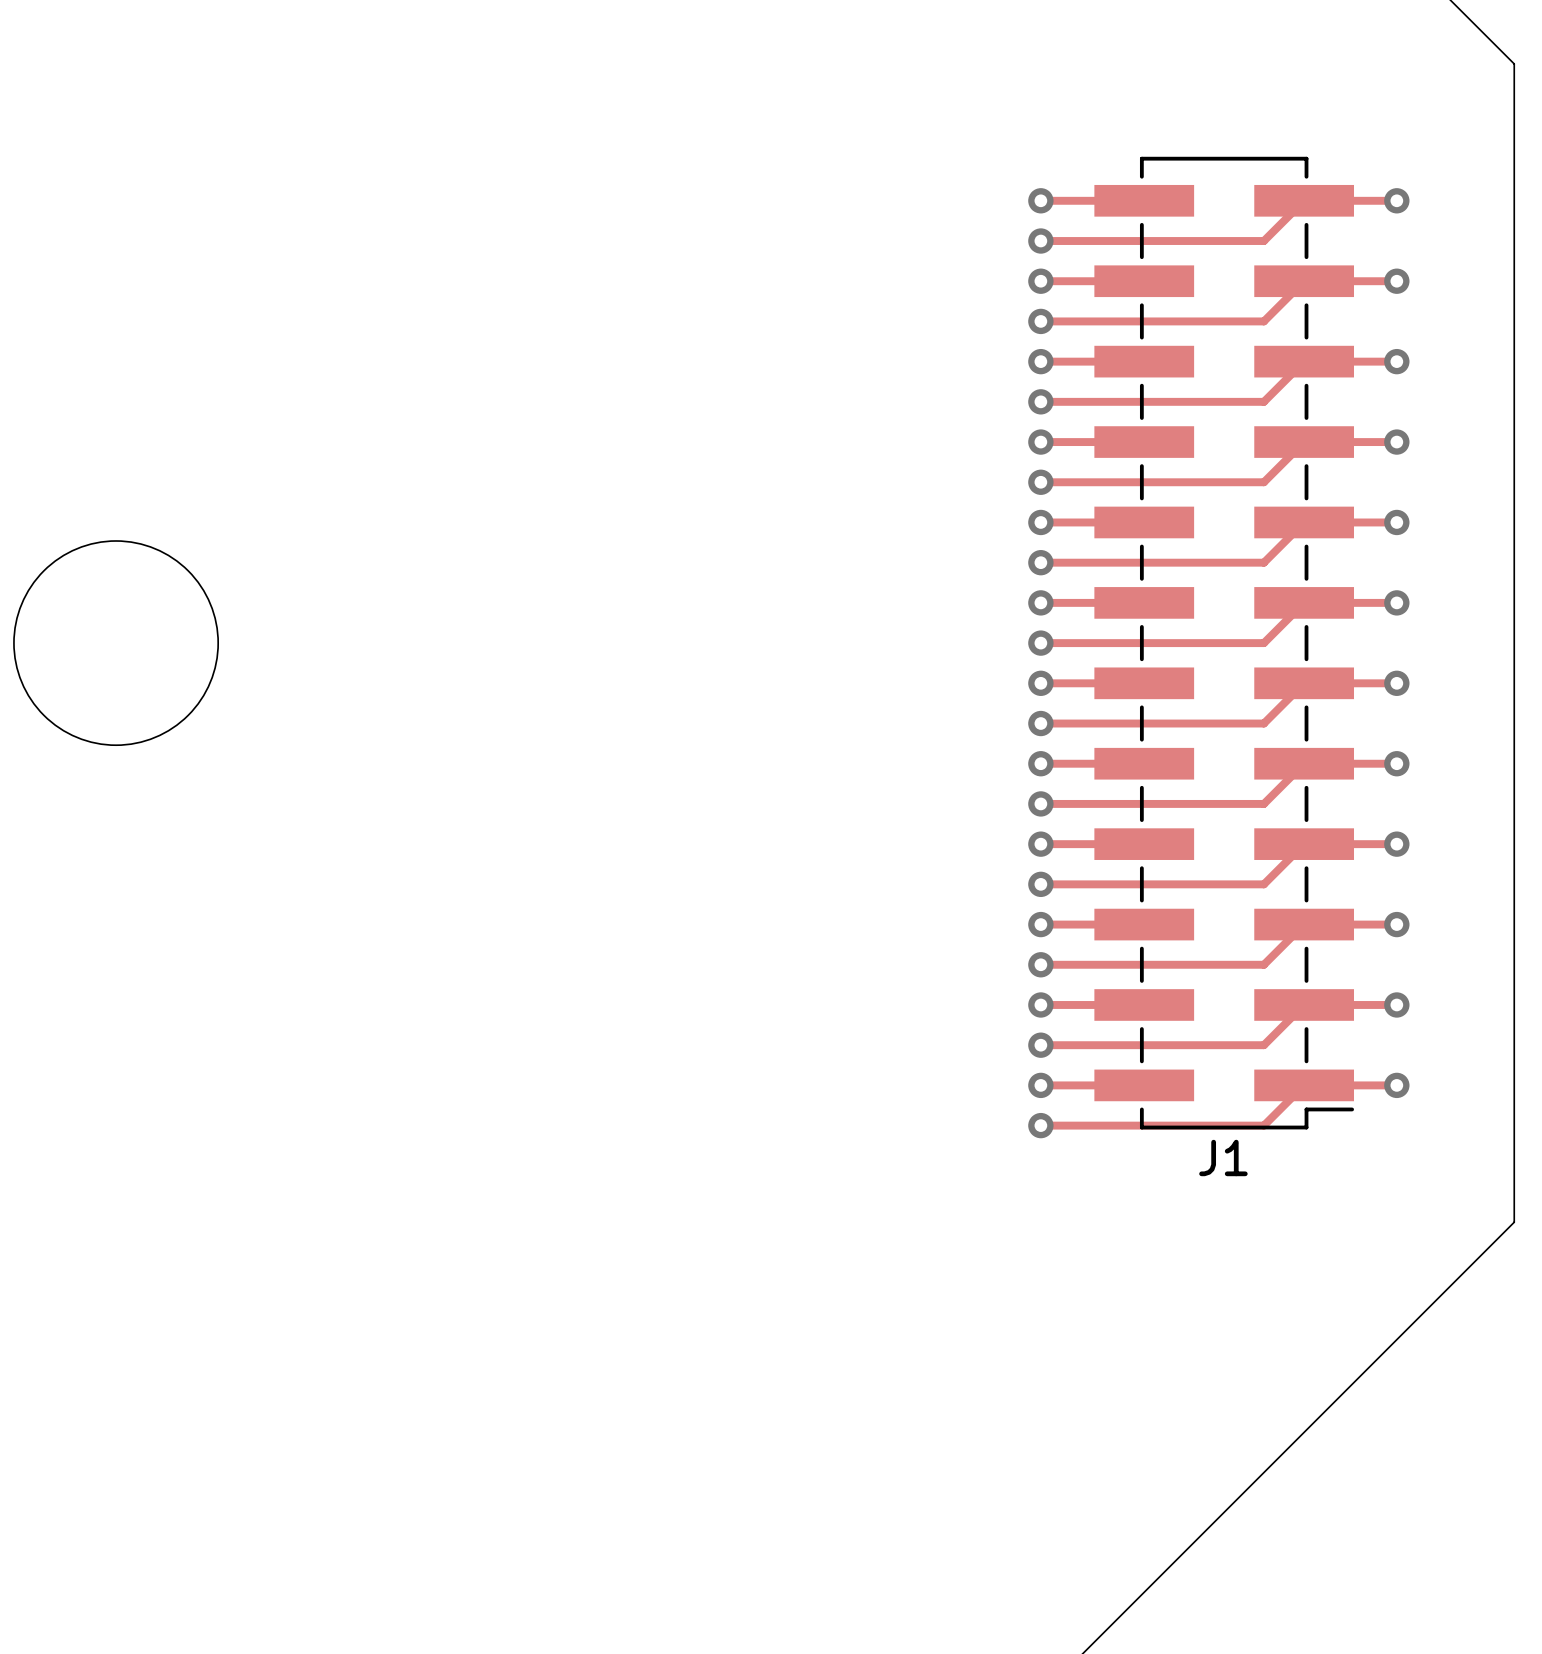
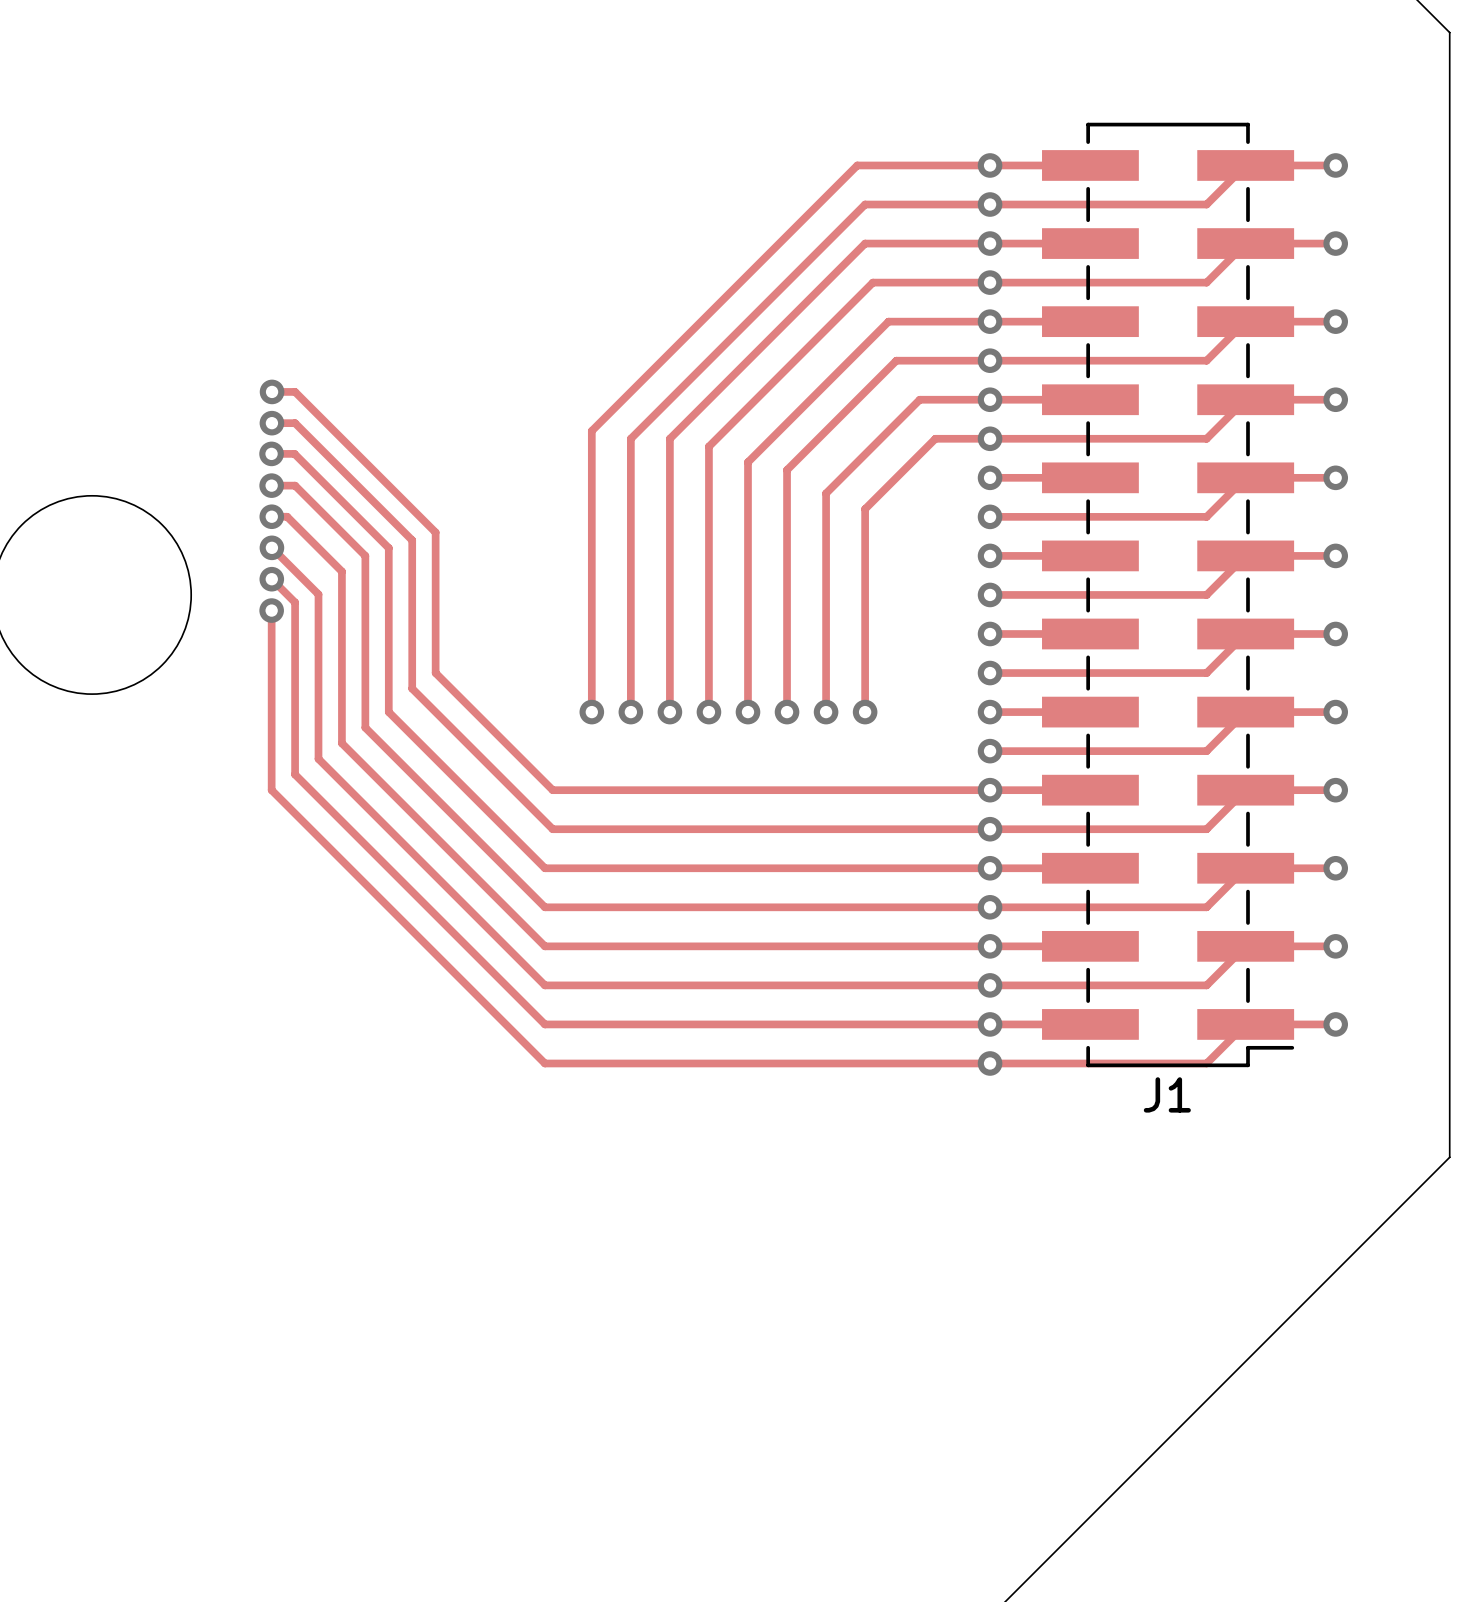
track: none -> (990, 165) (857, 165) (591, 430) (591, 712)
track: none -> (990, 204) (865, 204) (630, 438) (630, 712)
track: none -> (990, 243) (865, 243) (669, 438) (669, 712)
track: none -> (990, 282) (872, 282) (708, 446) (708, 712)
track: none -> (990, 321) (888, 321) (747, 462) (747, 712)
track: none -> (990, 360) (896, 360) (787, 470) (787, 712)
track: none -> (272, 391) (295, 391) (435, 532) (435, 673) (552, 790) (990, 790)
via: none -> (272, 391)
track: none -> (990, 399) (919, 399) (826, 493) (826, 712)
track: none -> (271, 423) (295, 423) (412, 540) (412, 688) (552, 829) (990, 829)
via: none -> (271, 423)
track: none -> (990, 438) (935, 438) (865, 509) (865, 712)
track: none -> (271, 453) (294, 453) (388, 548) (388, 712) (544, 868) (990, 868)
via: none -> (271, 453)
track: none -> (271, 485) (295, 485) (365, 555) (365, 727) (544, 907) (990, 907)
via: none -> (271, 485)
track: none -> (271, 516) (287, 516) (341, 571) (341, 743) (544, 946) (990, 946)
via: none -> (271, 516)
track: none -> (271, 547) (318, 594) (318, 758) (544, 985) (990, 985)
via: none -> (271, 547)
track: none -> (271, 579) (295, 602) (295, 774) (544, 1024) (990, 1024)
via: none -> (271, 579)
track: none -> (271, 610) (271, 790) (544, 1063) (990, 1063)
via: none -> (271, 610)
via: none -> (591, 712)
via: none -> (630, 712)
via: none -> (669, 712)
via: none -> (708, 712)
via: none -> (747, 712)
via: none -> (787, 712)
via: none -> (826, 712)
via: none -> (865, 712)

